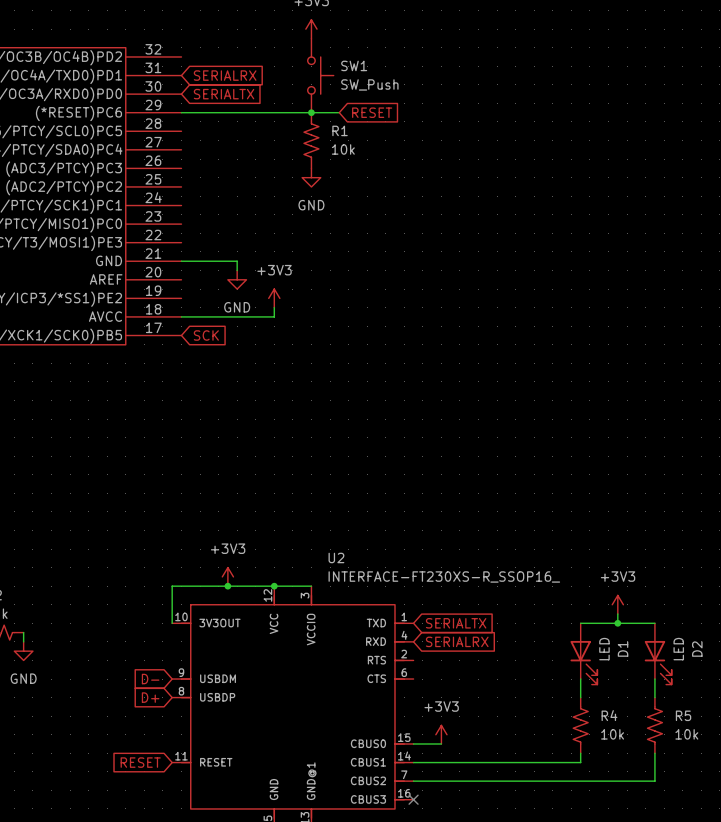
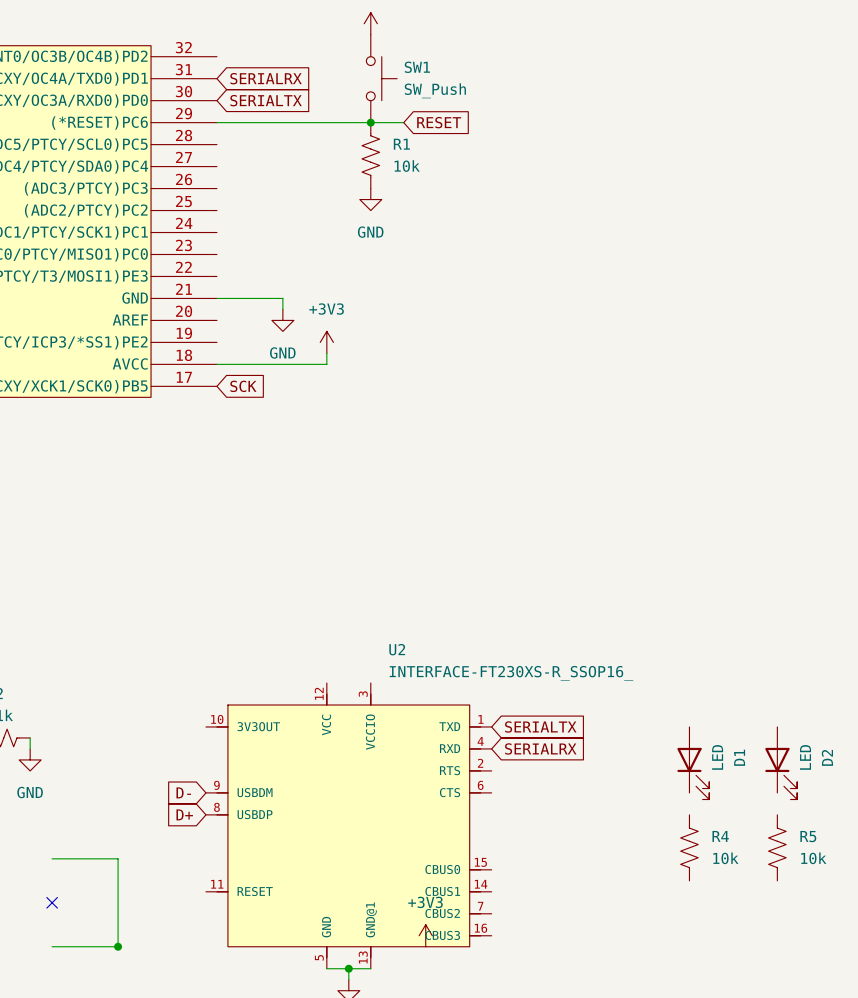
power symbol: +3V3 (227, 576) -> none
junction: (227, 586) -> none
junction: (274, 586) -> none
wire: (311, 586) (172, 586) (172, 623) -> none
power symbol: +3V3 (617, 604) -> none
wire: (617, 614) (617, 623) -> none
wire: (580, 623) (654, 623) -> none
junction: (617, 623) -> none
wire: (580, 679) (580, 697) -> none
wire: (654, 679) (654, 697) -> none
wire: none -> (52, 858) (118, 858) (118, 946) (52, 946)
power symbol position: +3V3 (441, 734) -> +3V3 (425, 935)
wire: (413, 744) (441, 744) -> none
wire: (580, 753) (580, 762) (413, 762) -> none
wire: (654, 753) (654, 781) (413, 781) -> none
global label: RESET (140, 762) -> none
no-connect mark: none -> (52, 902)
no-connect mark: (413, 799) -> none
junction: none -> (118, 946)

